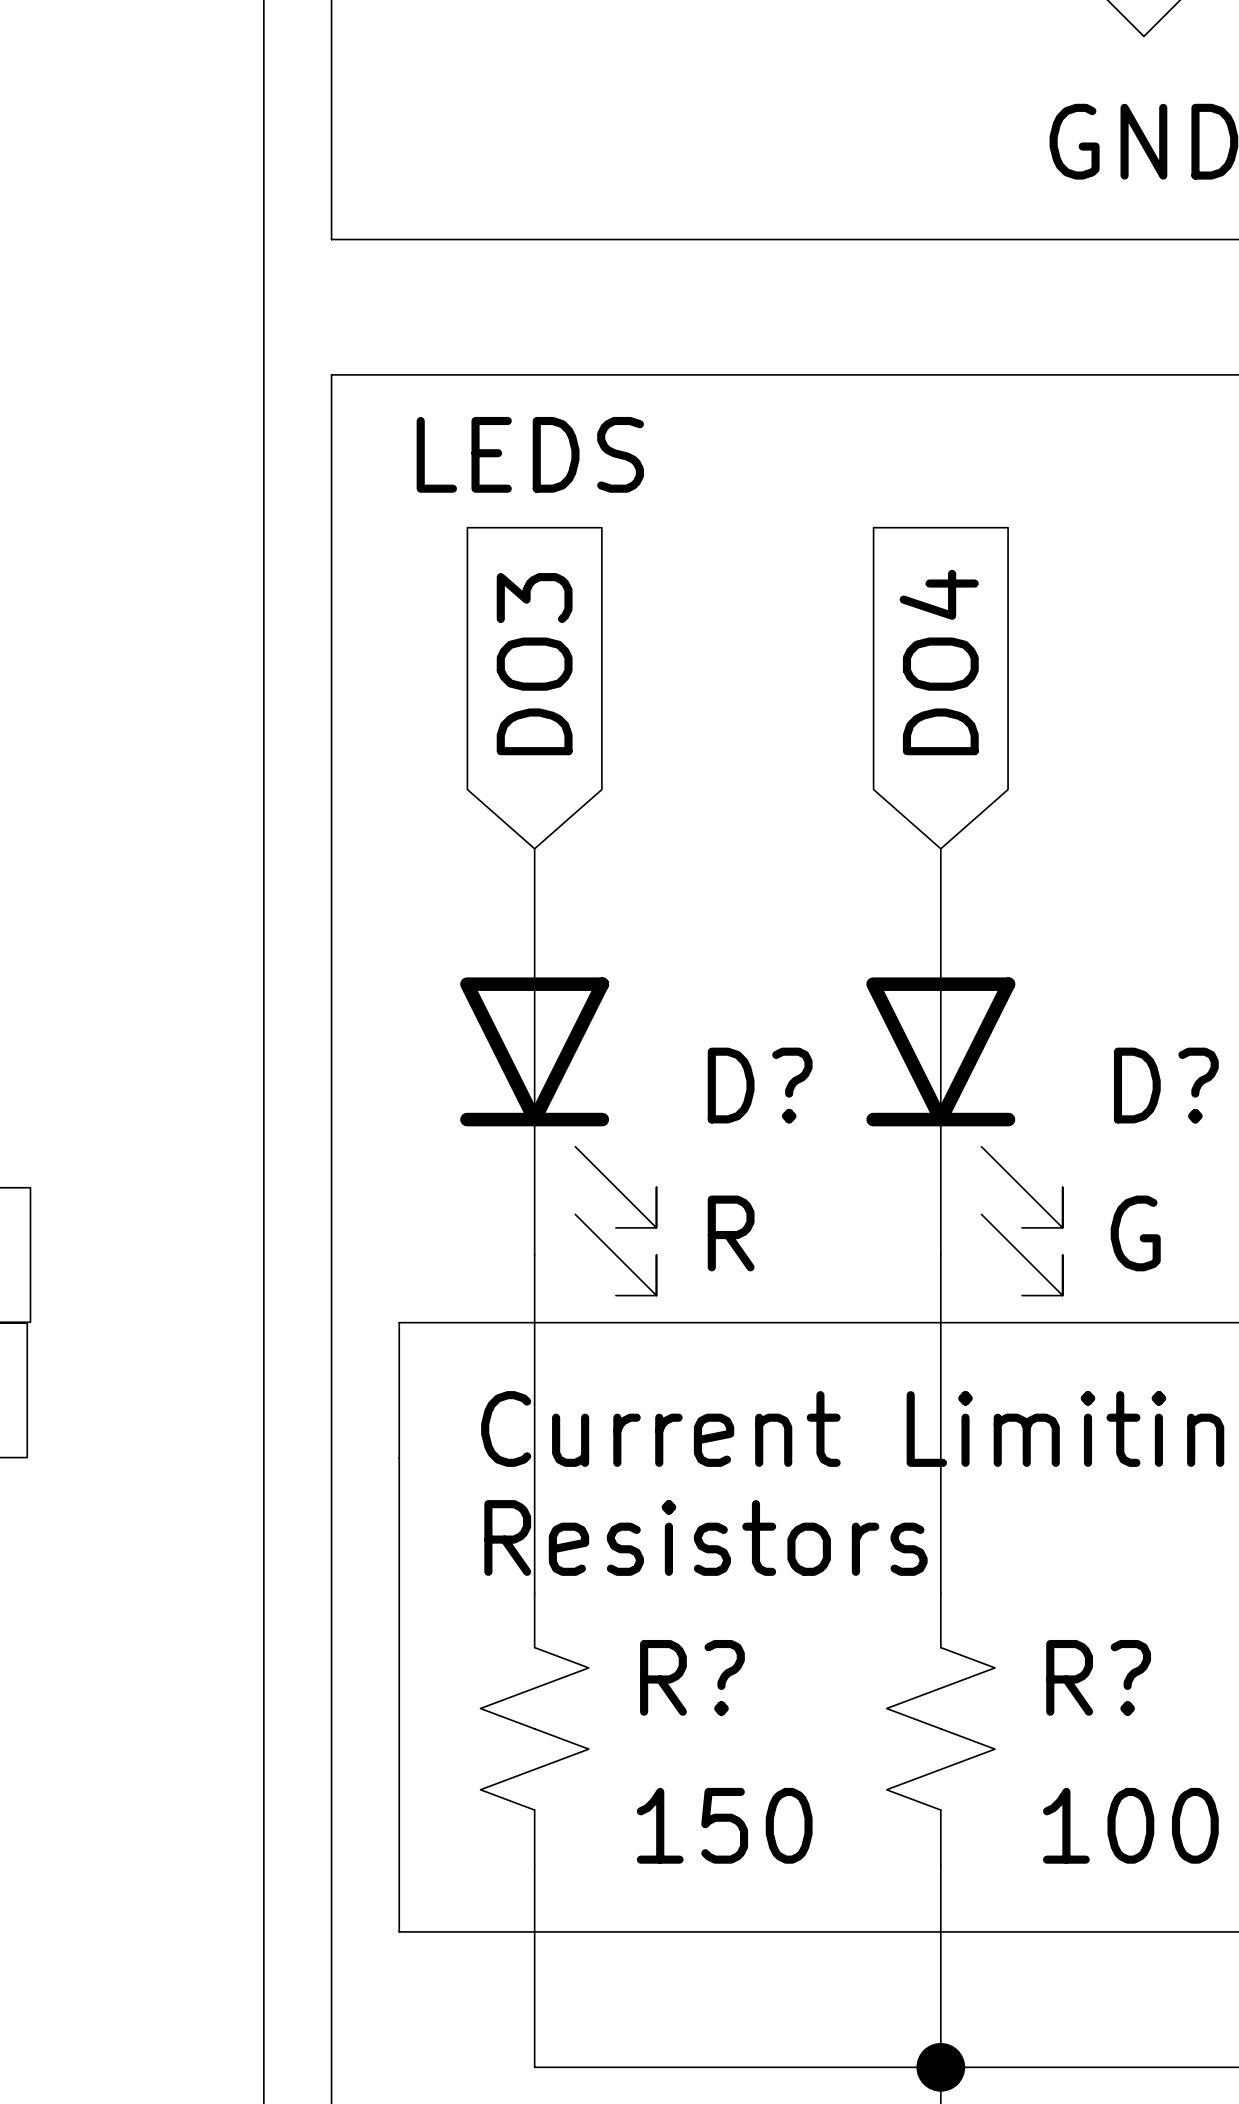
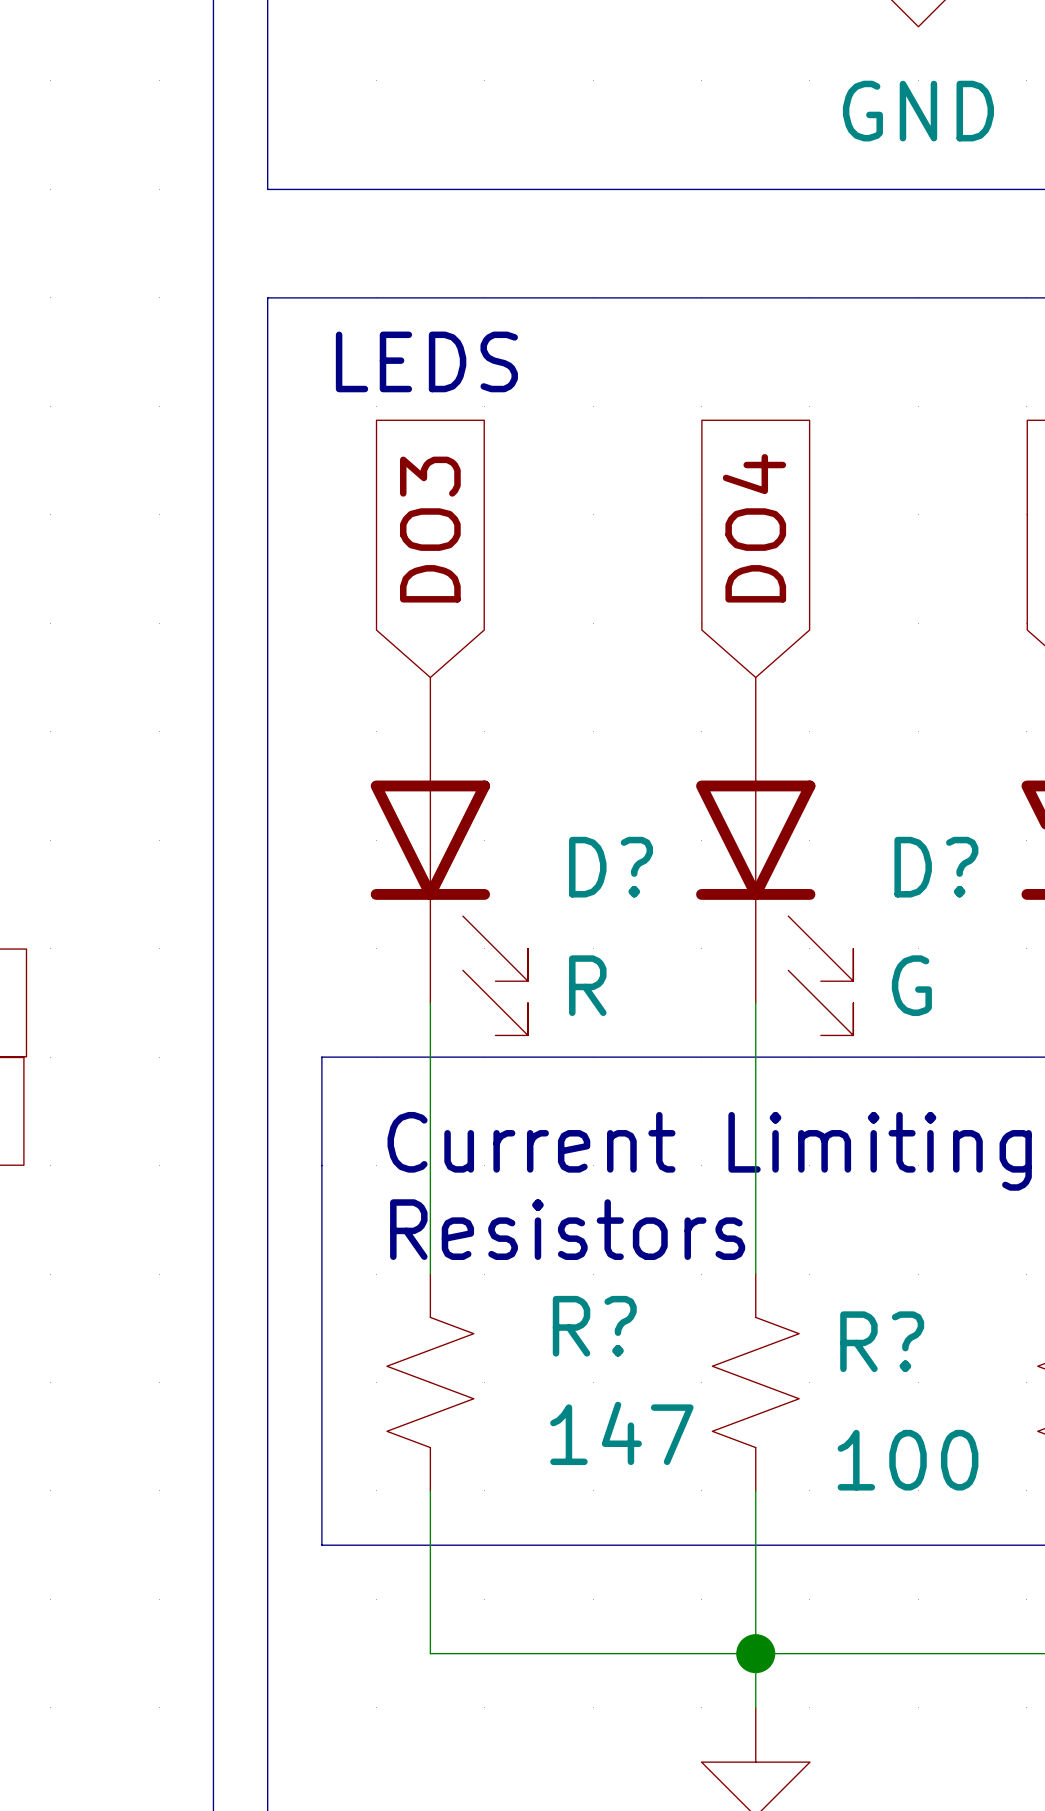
R? name position: R? (692, 1677) -> R? (594, 1326)
R? value: 150 (724, 1825) -> 147 (621, 1433)

